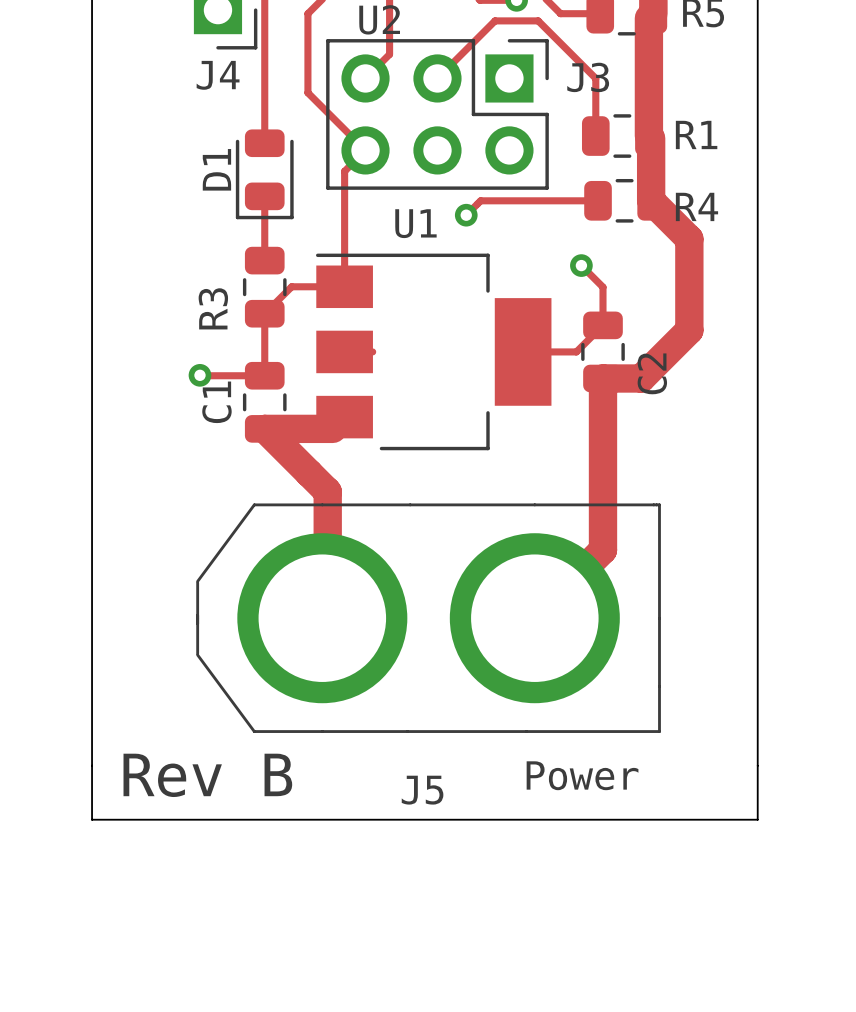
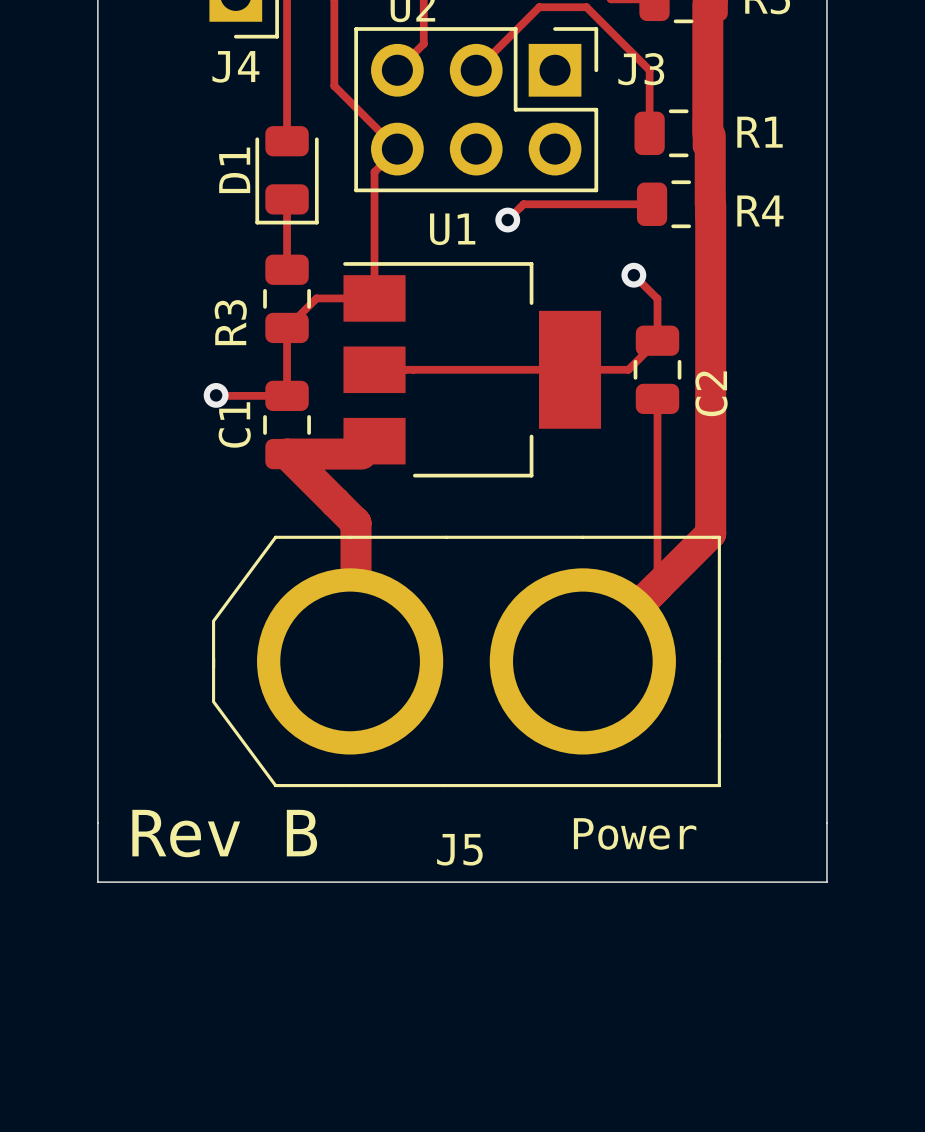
track: (651, 201) (689, 239) (689, 330) (641, 378) (602, 378) -> (710, 204) (710, 533) (657, 586)
track: none -> (405, 369) (551, 369)
track width: thick (602, 378) (602, 550) -> thin (657, 398) (657, 586)

